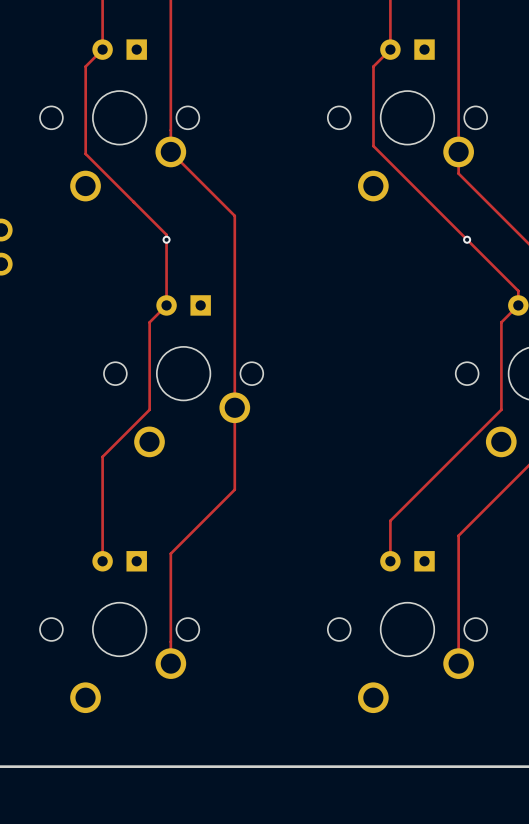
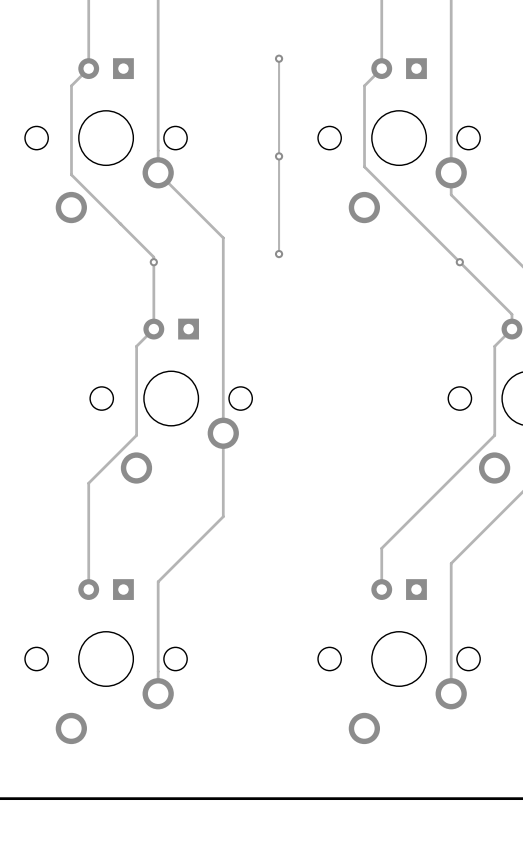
track: none -> (279, 58) (279, 254)
via: none -> (279, 58)
via: none -> (279, 156)
via: none -> (279, 254)

